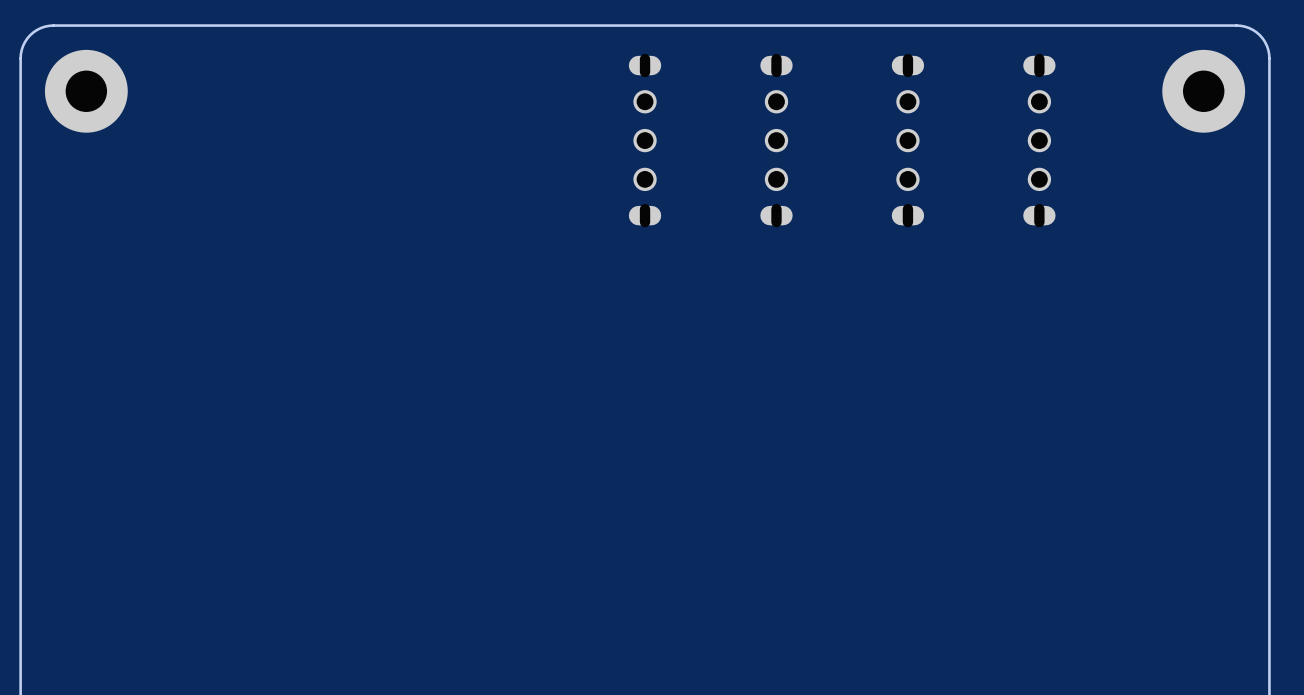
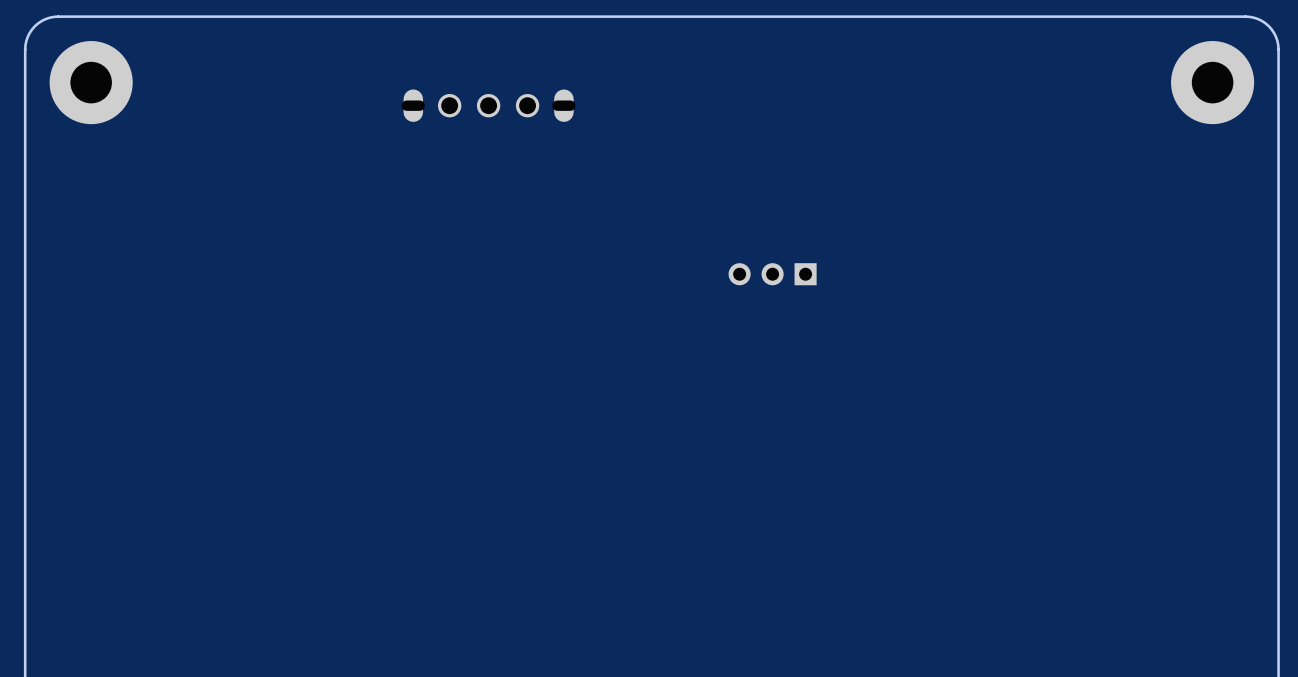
part: none -> (488, 105)
part: (645, 140) -> none
part: (776, 140) -> none
part: (907, 140) -> none
part: (1039, 140) -> none
part: none -> (772, 274)

